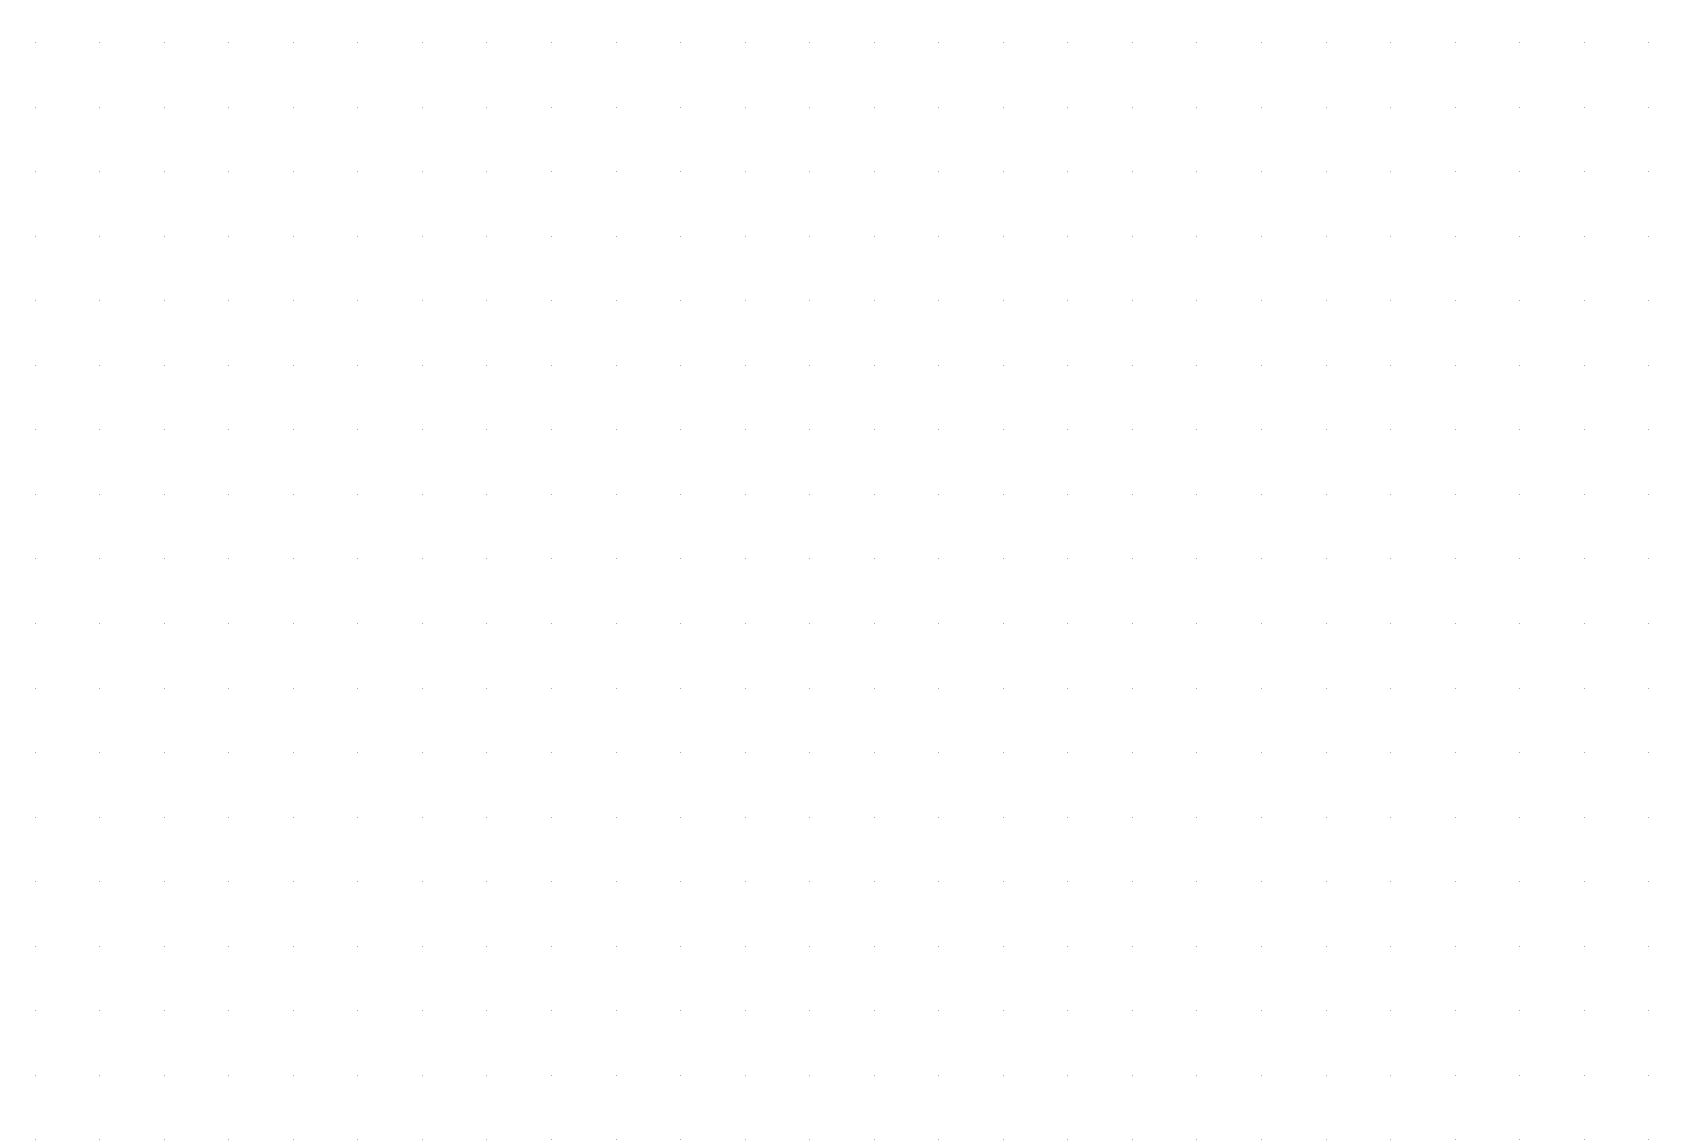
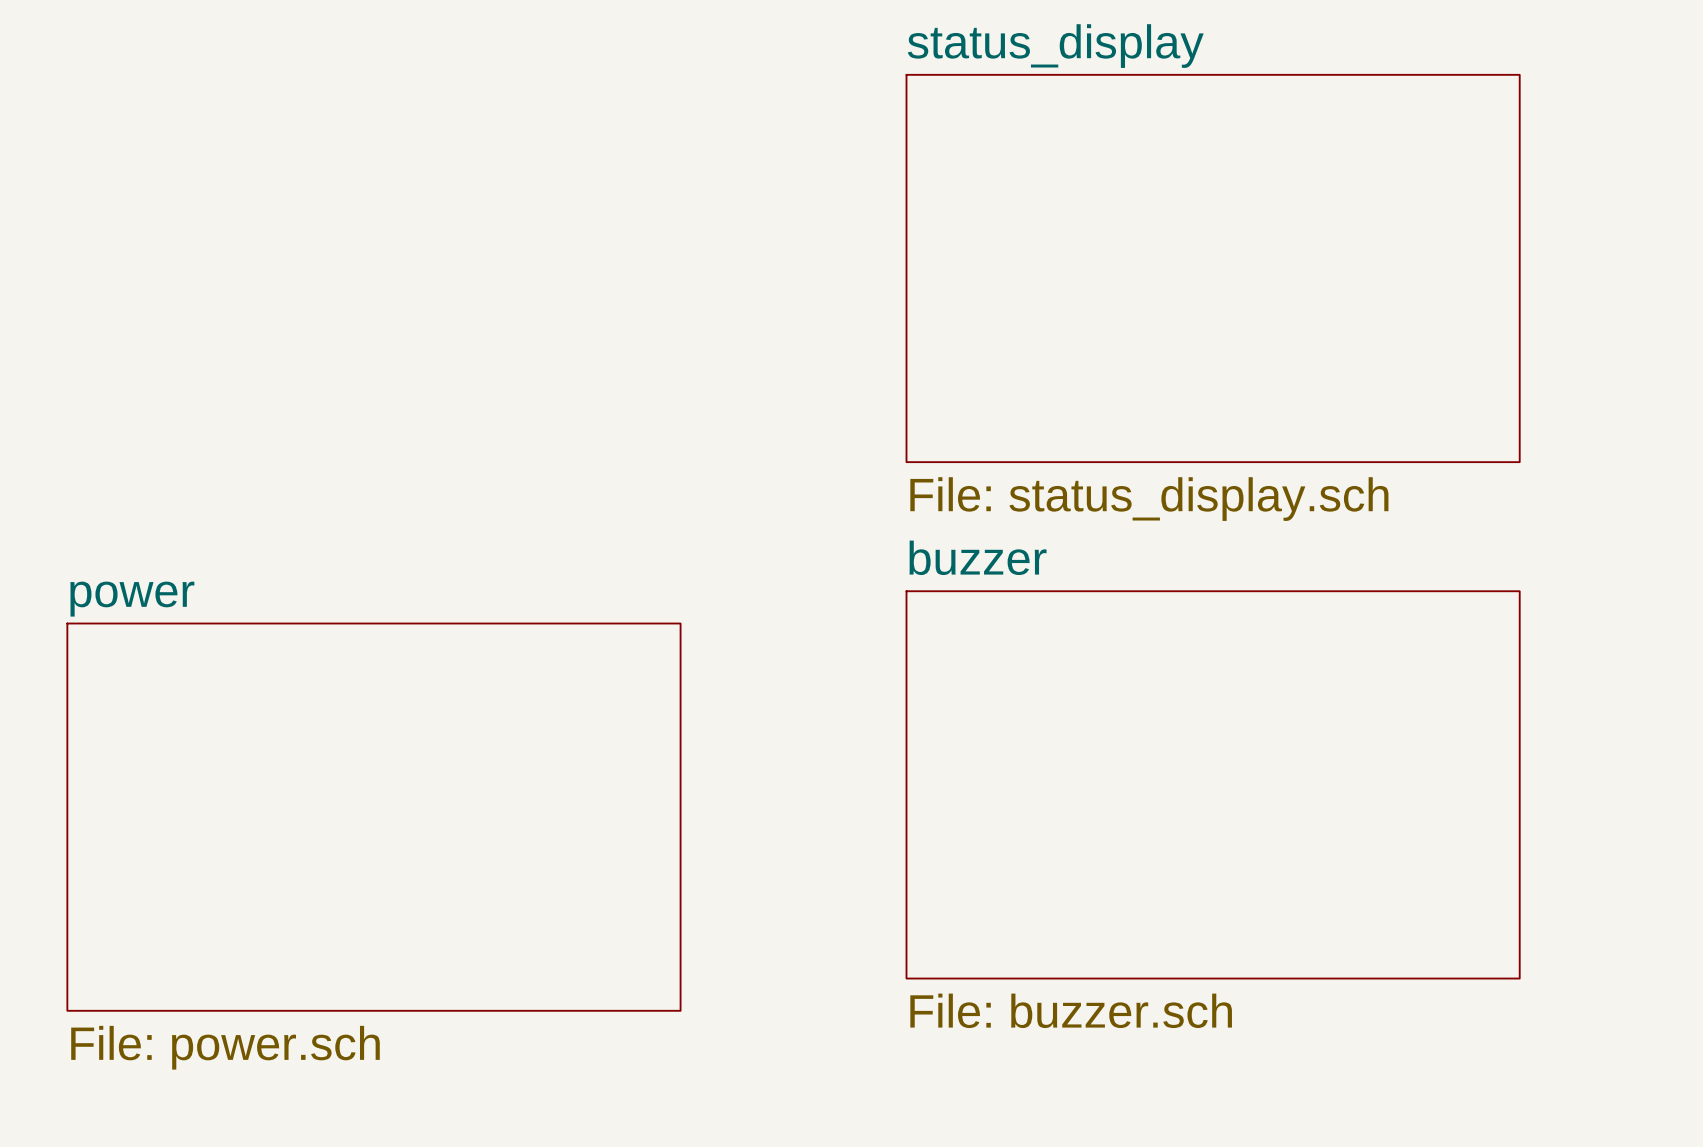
sheet status_display: none -> File: status_display.sch (1213, 268)
sheet buzzer: none -> File: buzzer.sch (1213, 784)
sheet power: none -> File: power.sch (373, 817)

